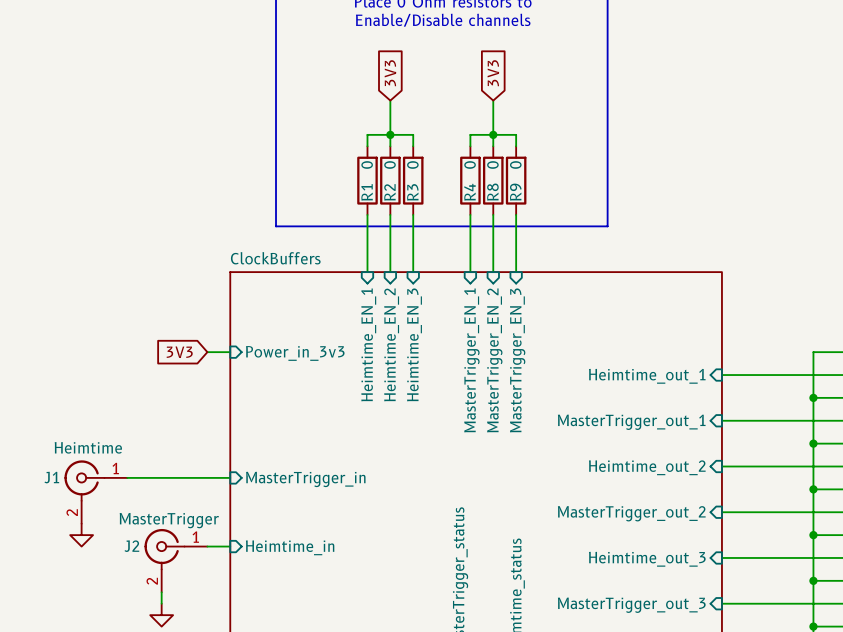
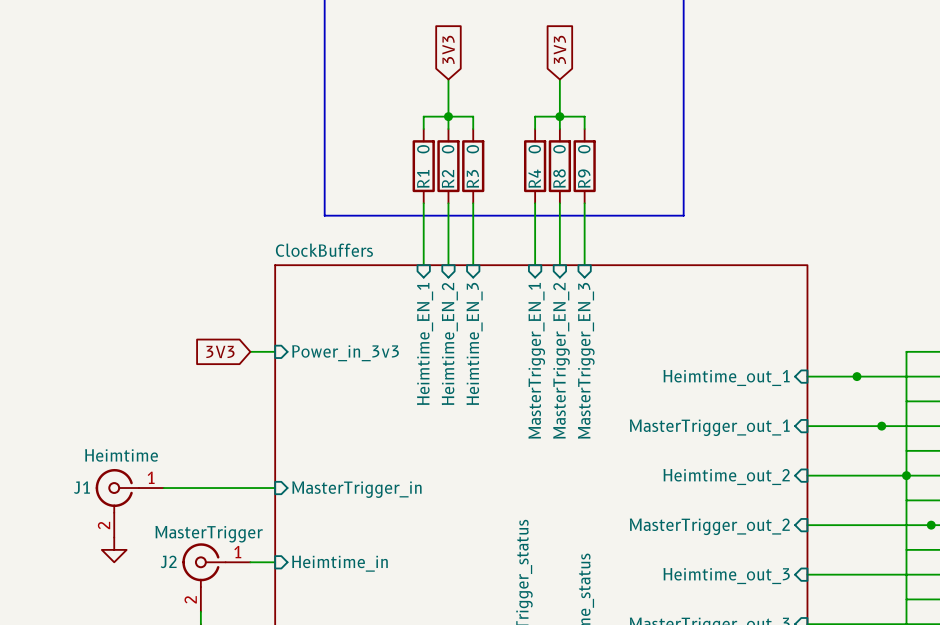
junction: none -> (856, 376)
junction: (813, 397) -> none
junction: none -> (881, 426)
junction: (813, 443) -> none
junction: none -> (906, 475)
junction: (813, 489) -> none
junction: none -> (931, 525)
junction: (813, 535) -> none
junction: (813, 580) -> none

